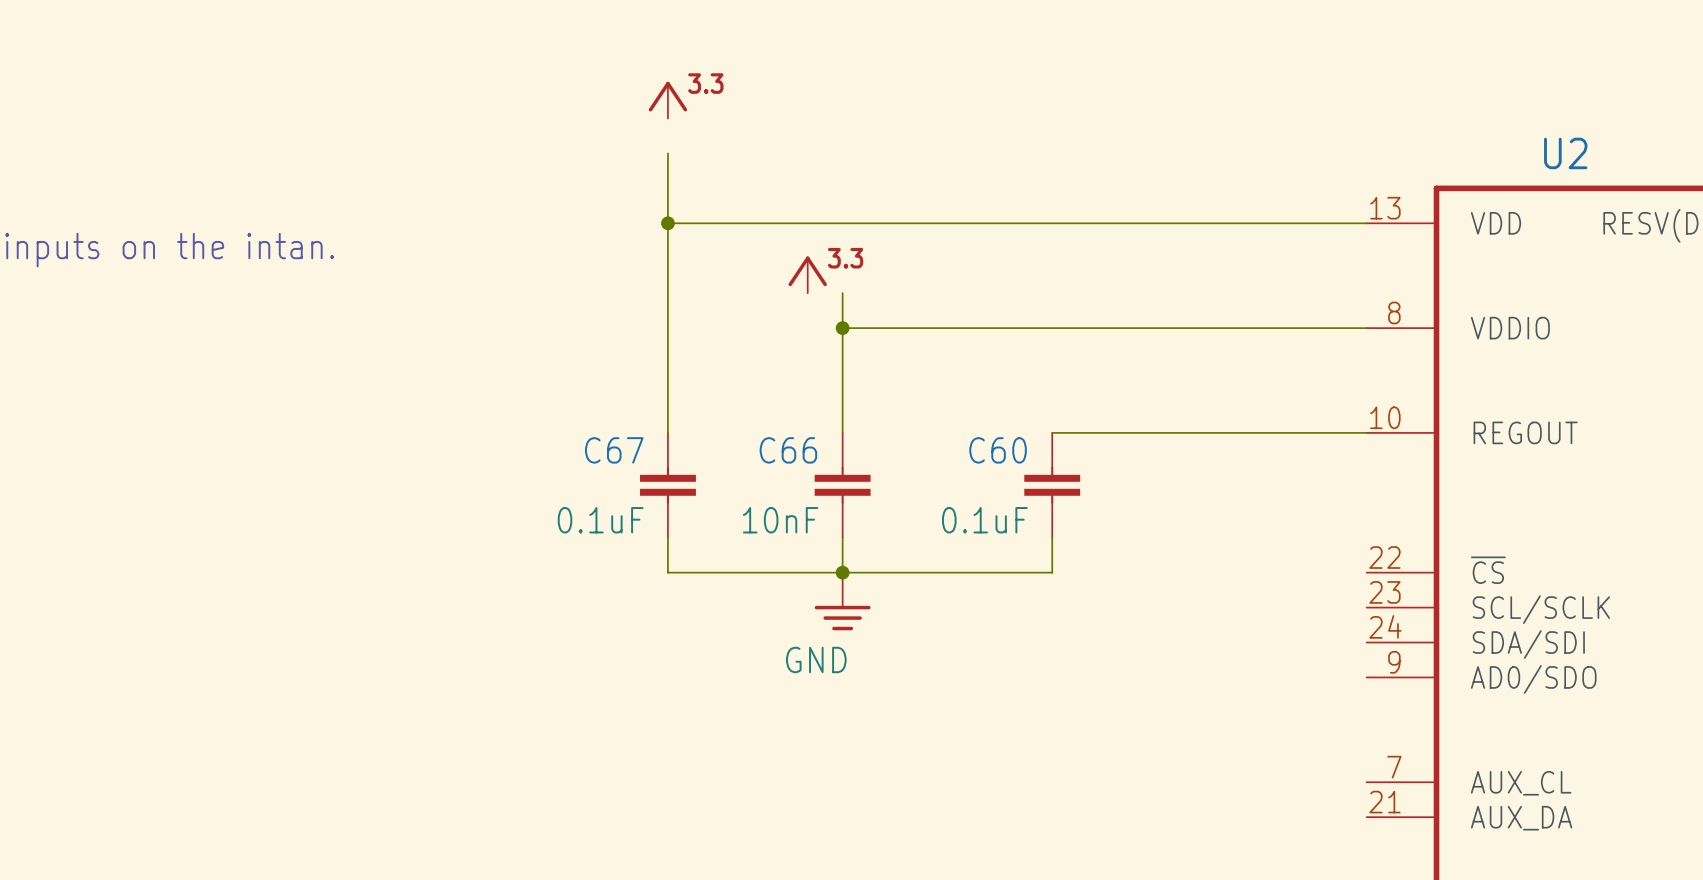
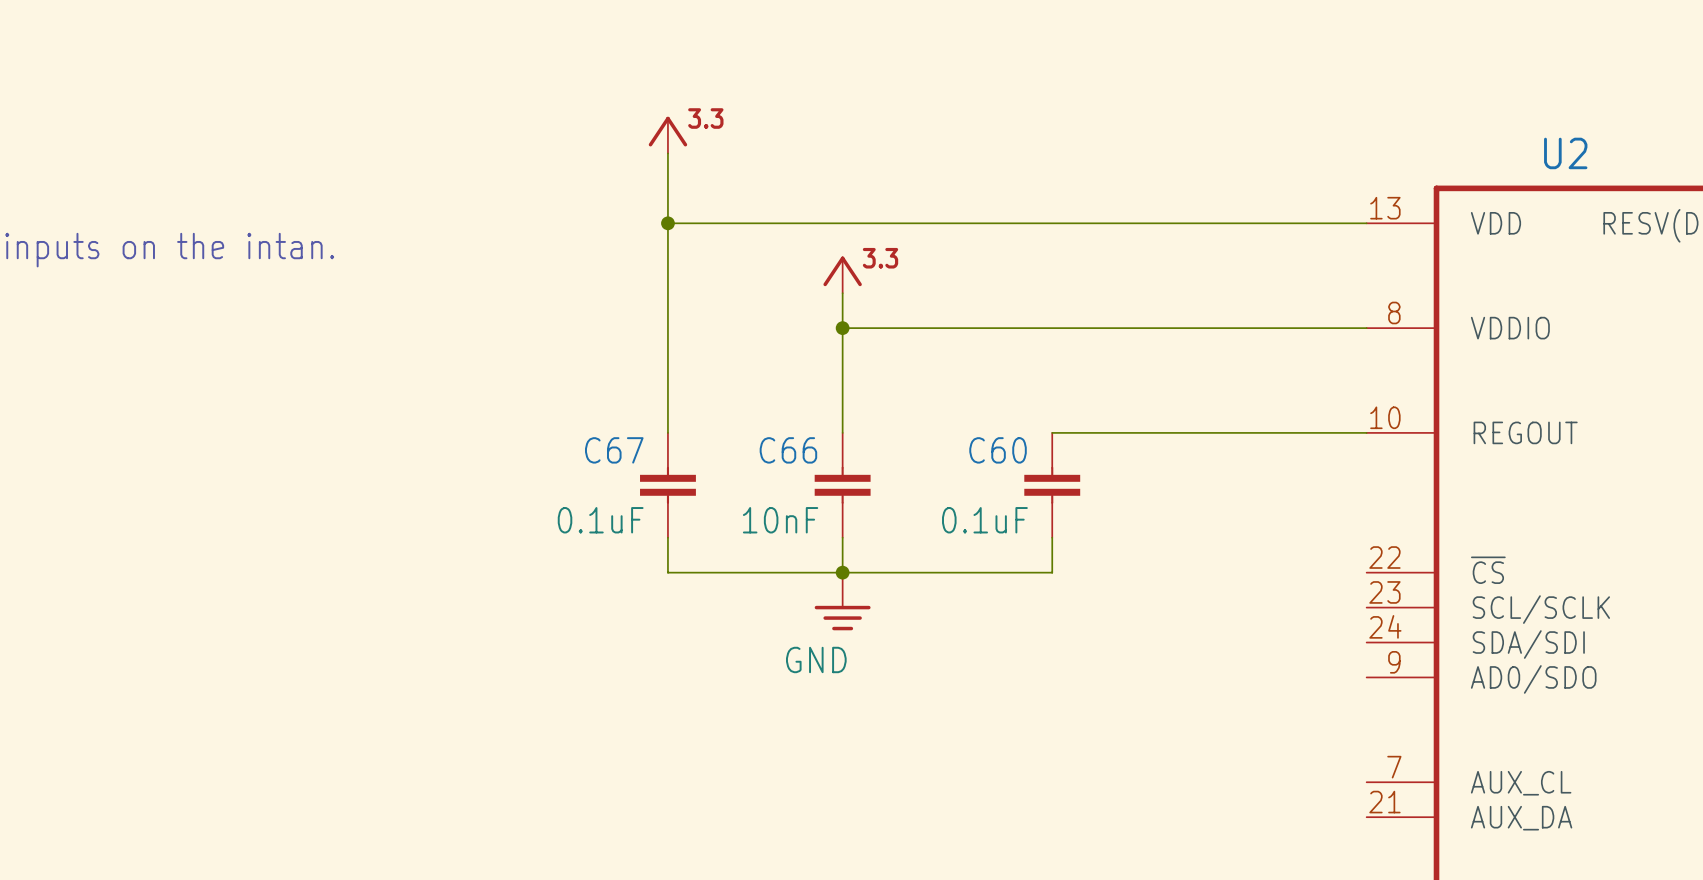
power symbol position: (667, 100) -> (667, 135)
power symbol position: (807, 274) -> (842, 274)

